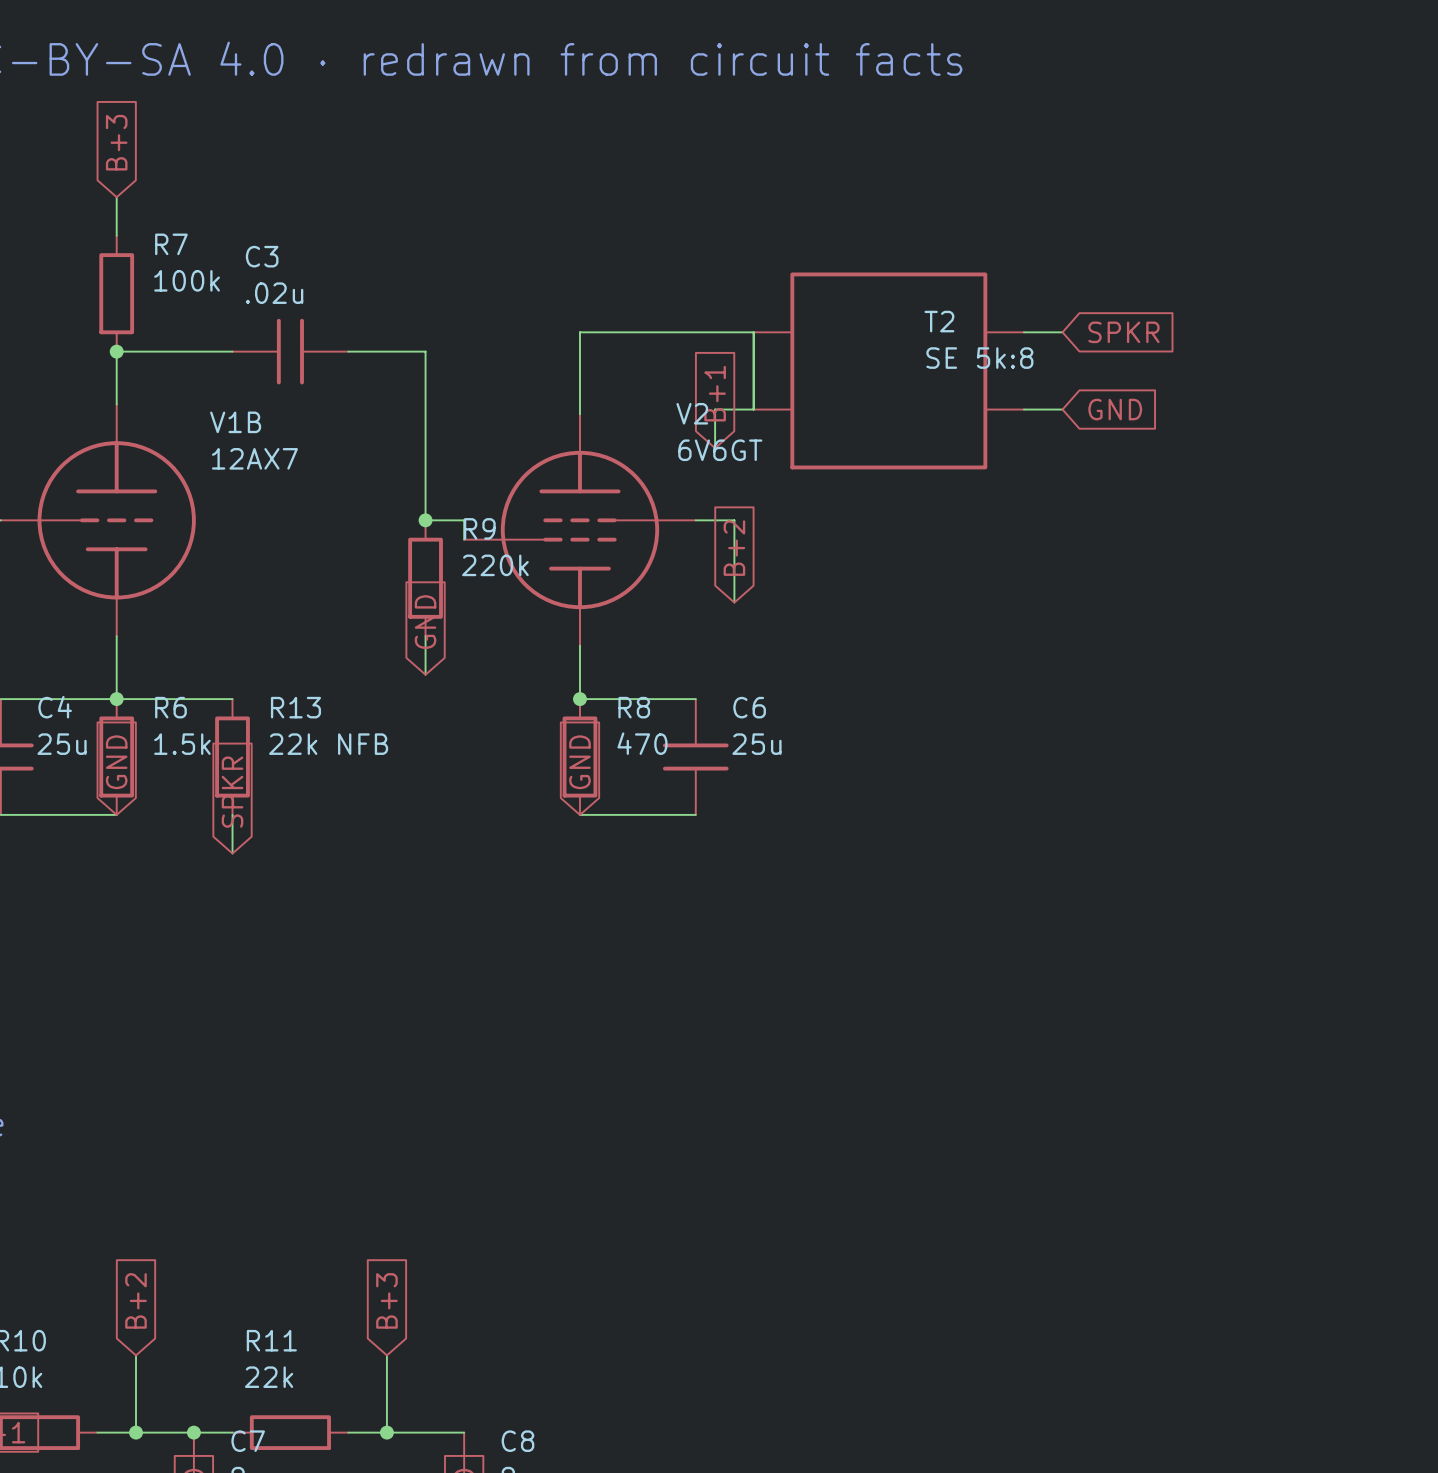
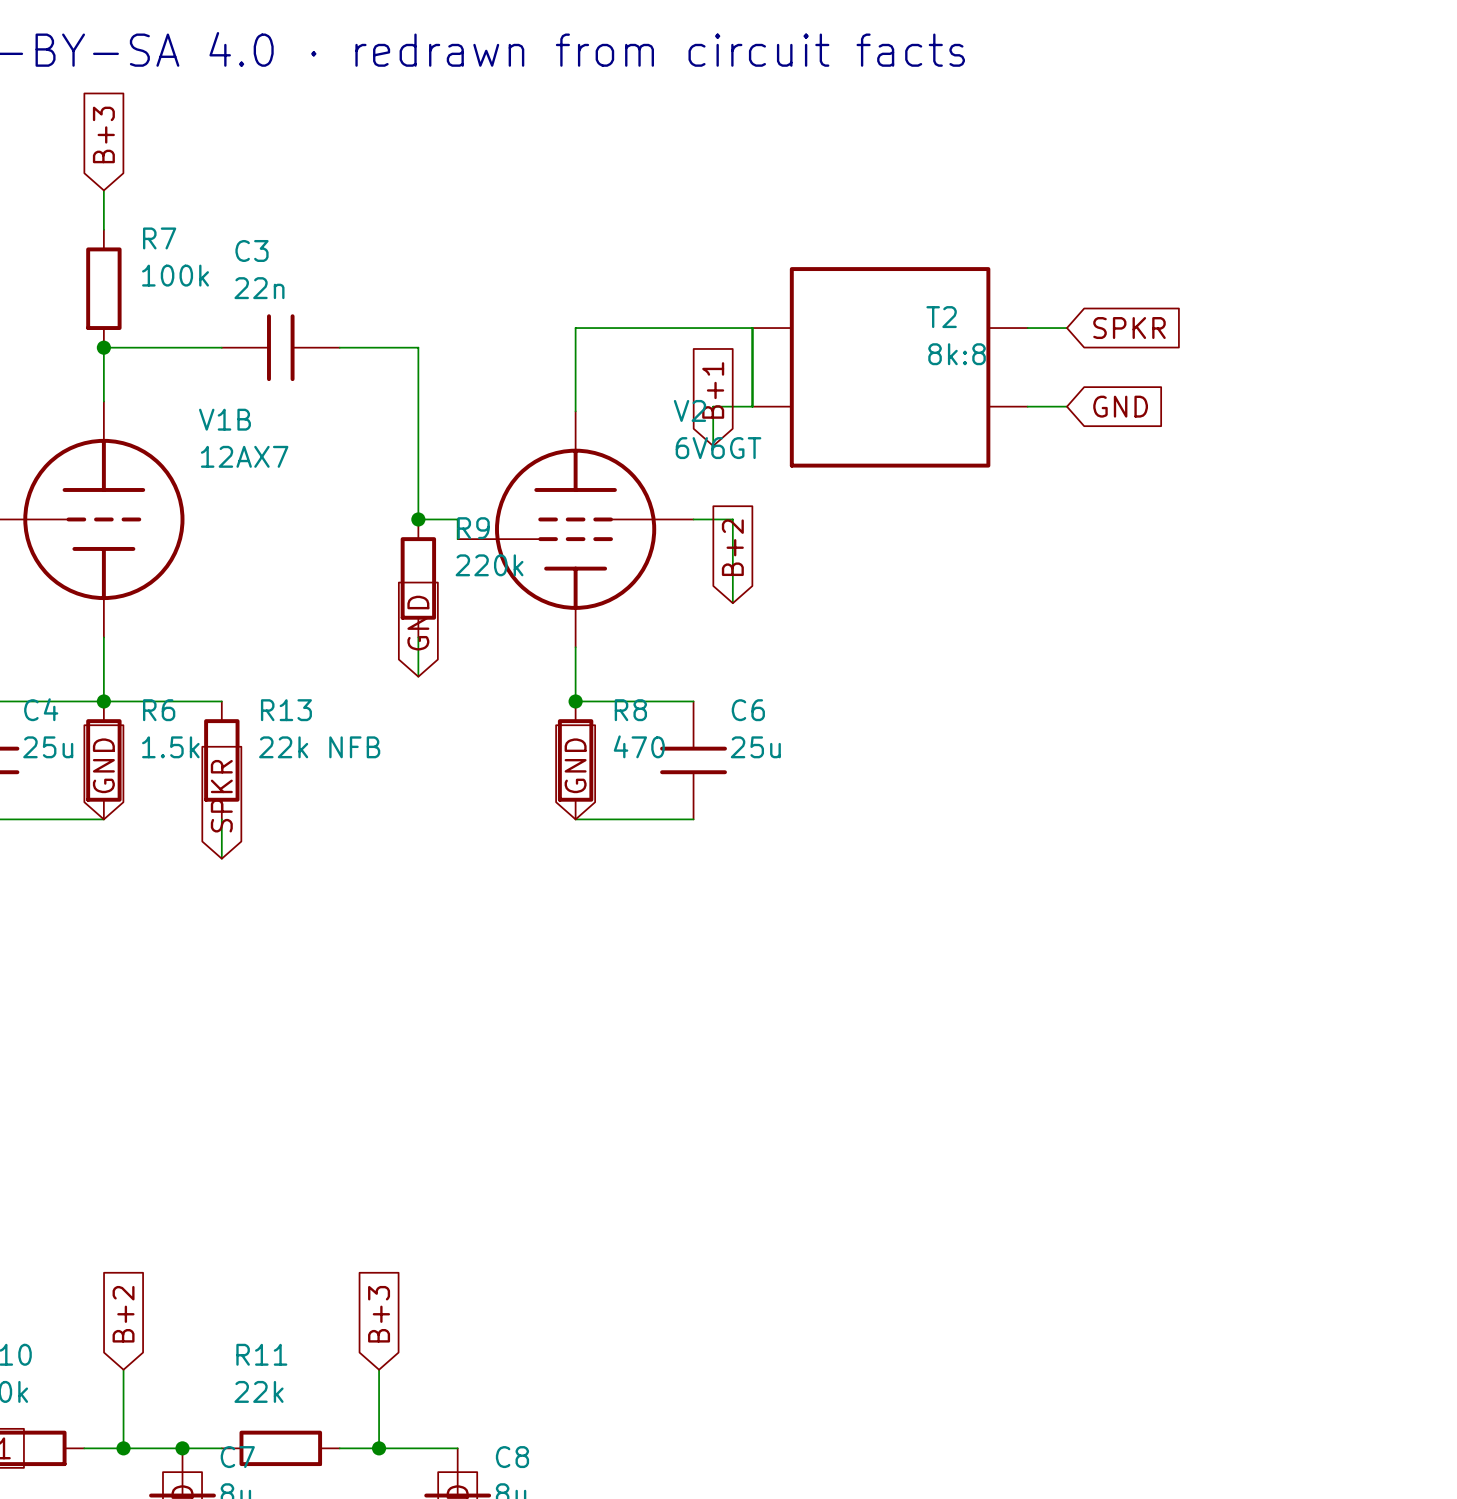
C3 value: .02u (274, 293) -> 22n (259, 288)
T2 value: SE 5k:8 (979, 358) -> 8k:8 (957, 354)

